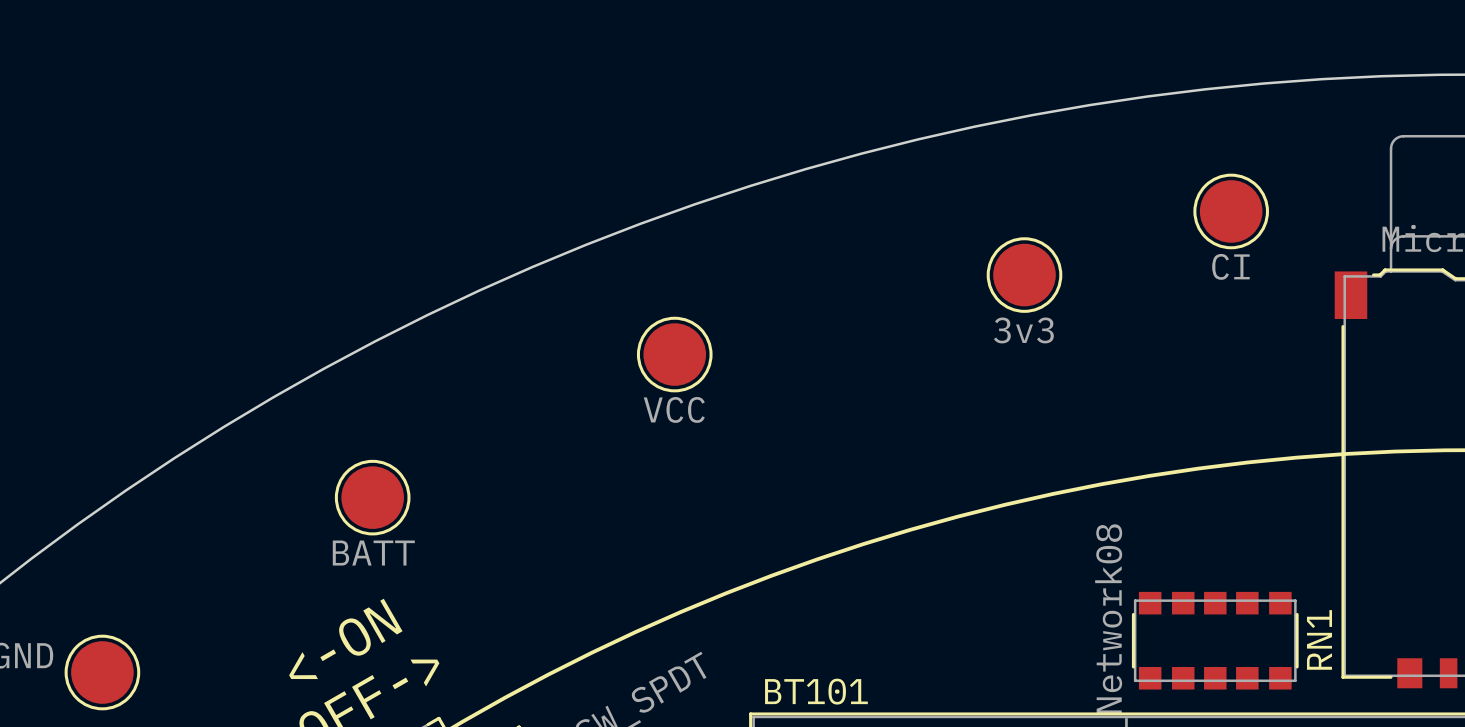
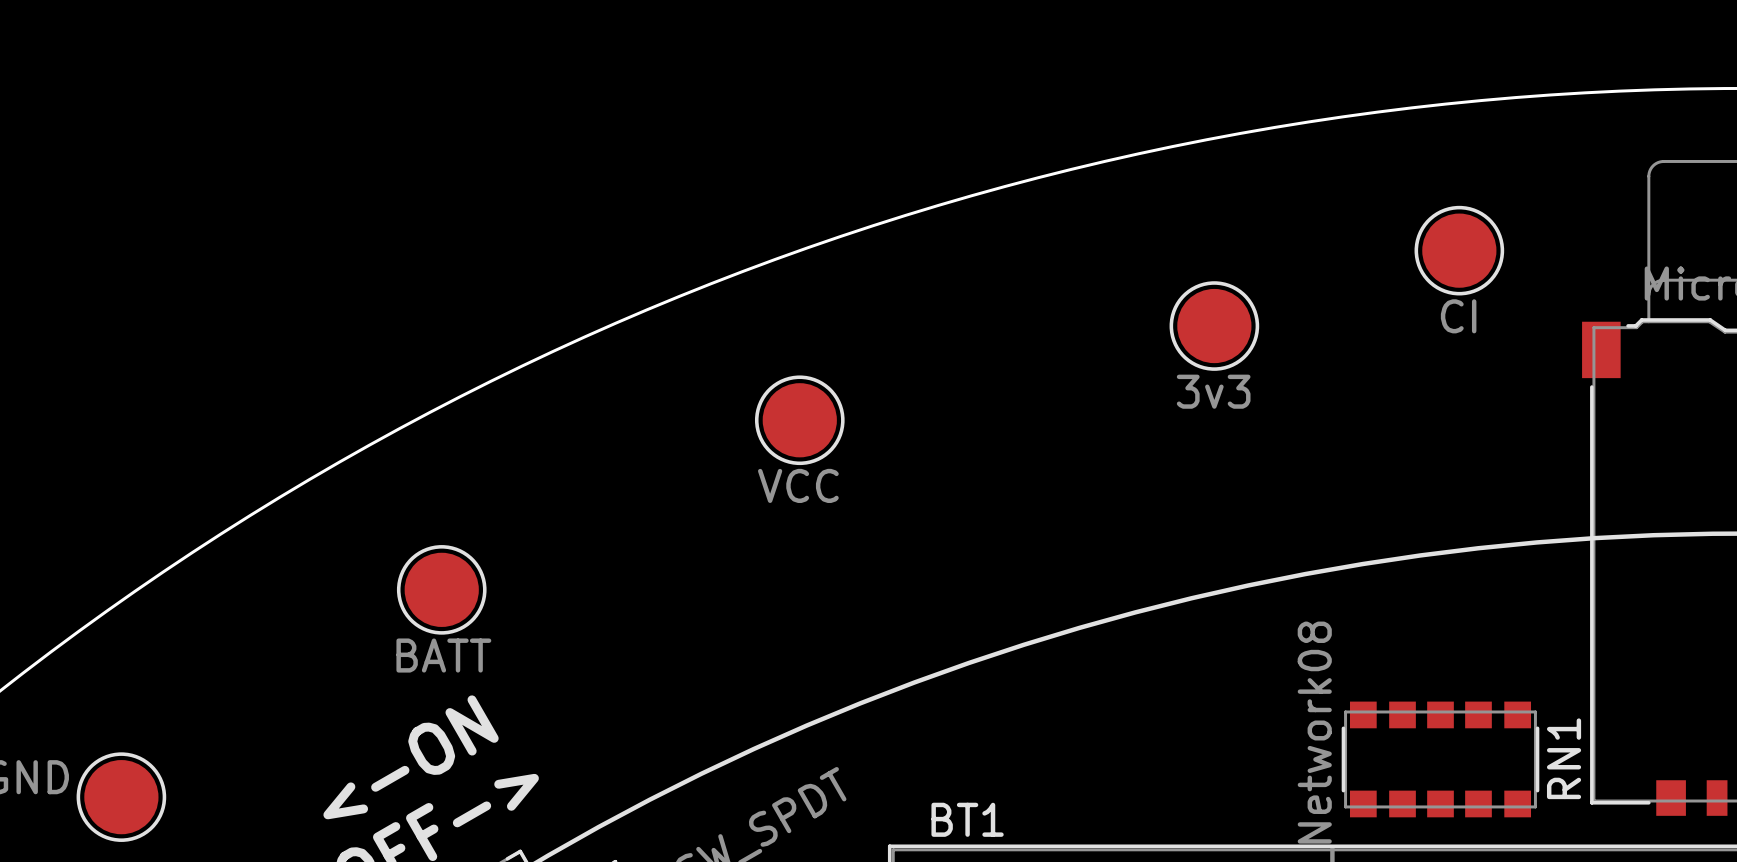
BT101 name: BT101 (816, 691) -> BT1 (967, 819)

